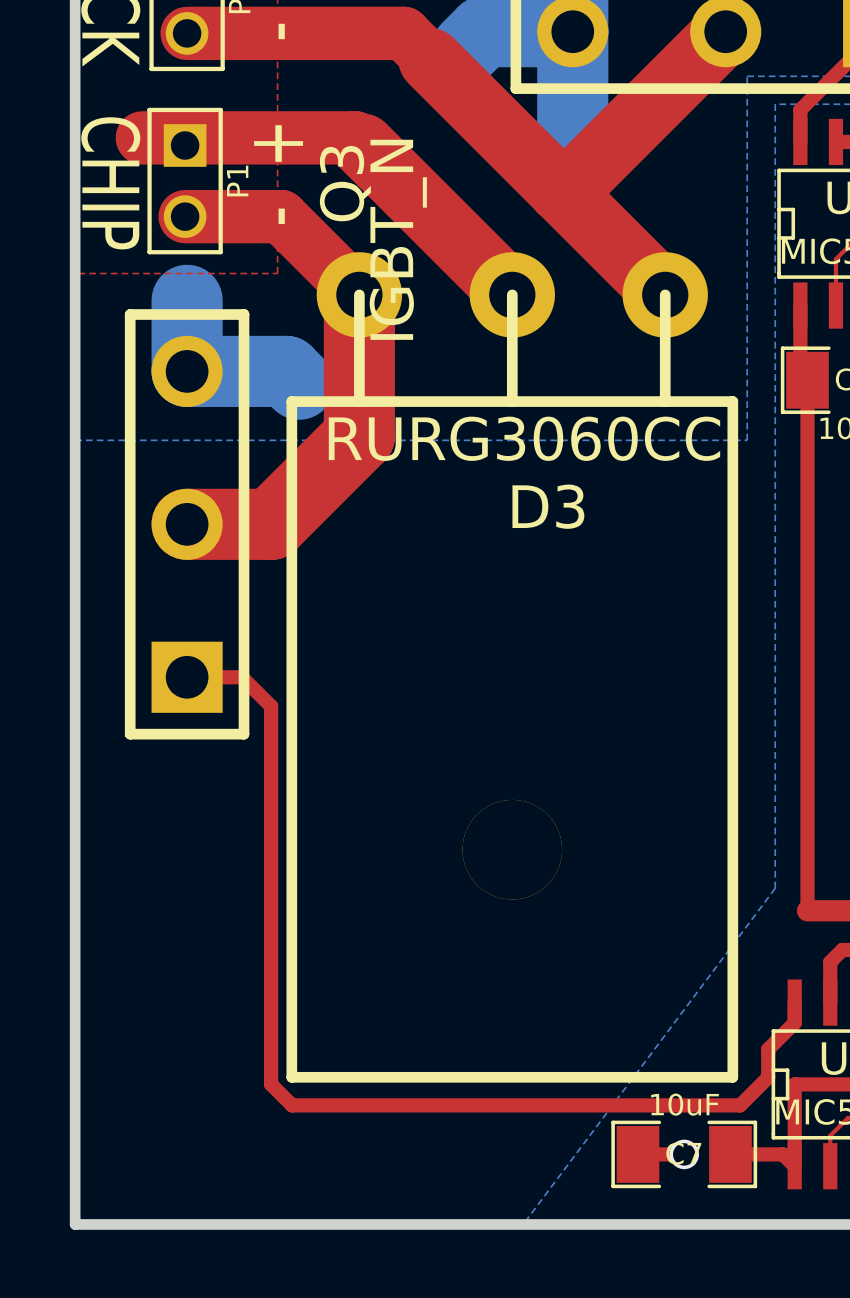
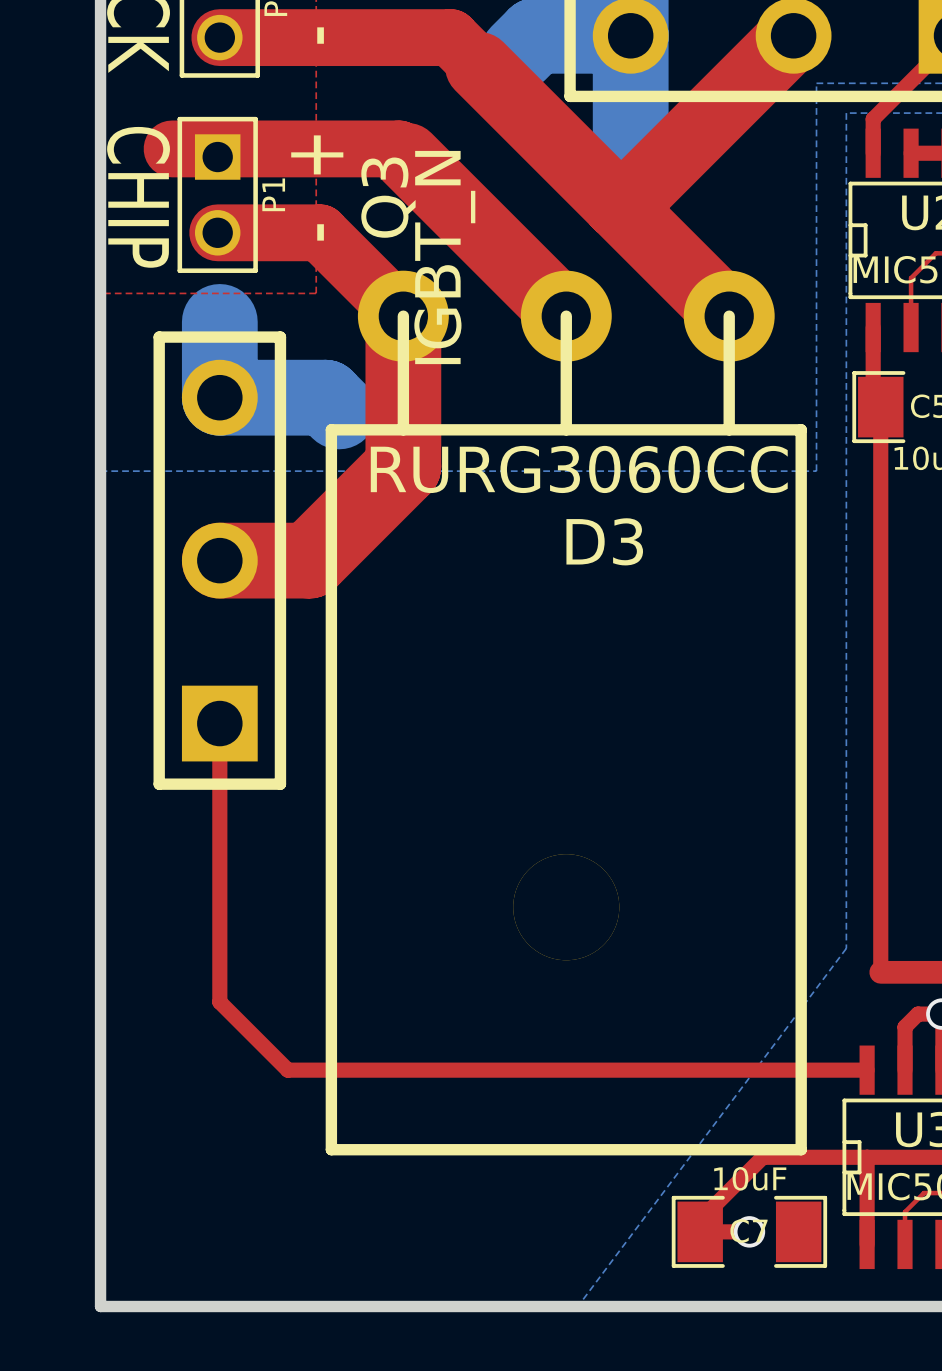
top track: (187, 677) (242, 677) (271, 706) (271, 1084) (292, 1105) (740, 1105) (768, 1077) (768, 1049) (794, 1022) (794, 1002) -> (219, 723) (219, 1002) (287, 1070) (867, 1070)
top track: none -> (867, 1157) (762, 1157) (701, 1218) (701, 1234)
top track: (730, 1154) (782, 1154) (794, 1166) -> none

